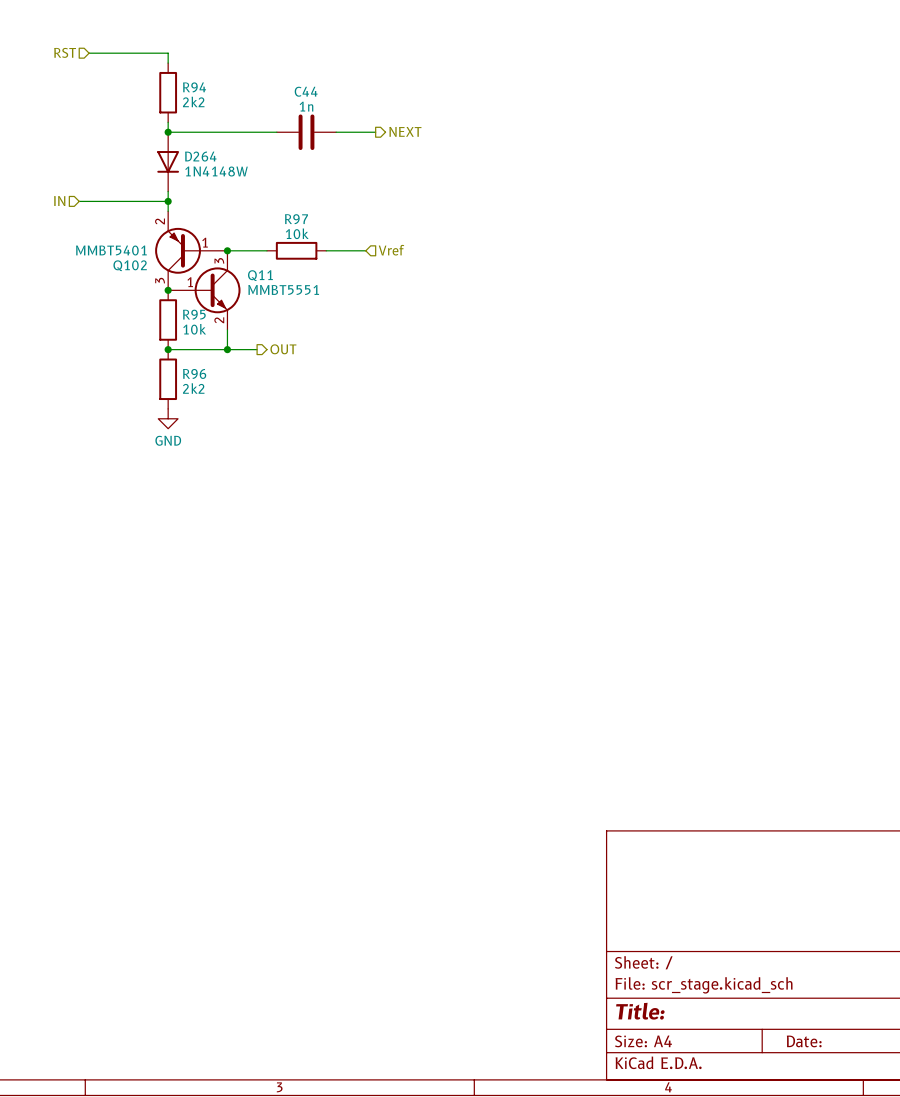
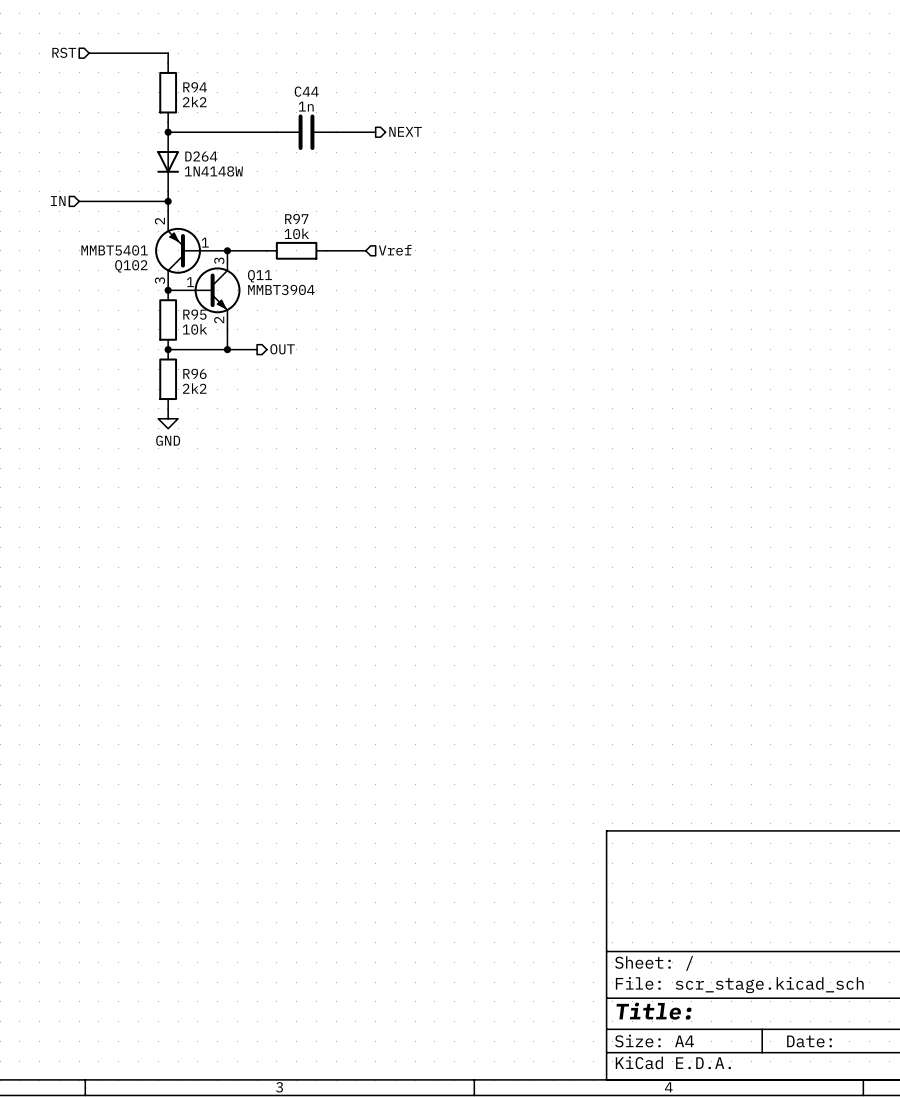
Q11 value: MMBT5551 (283, 289) -> MMBT3904 (281, 289)

